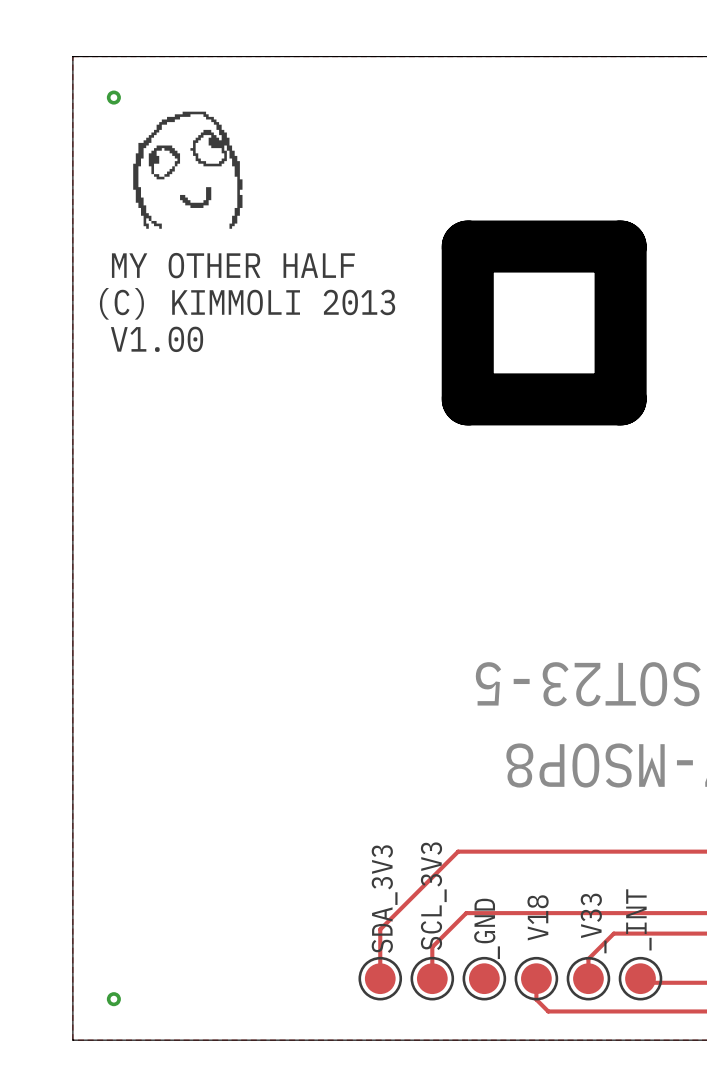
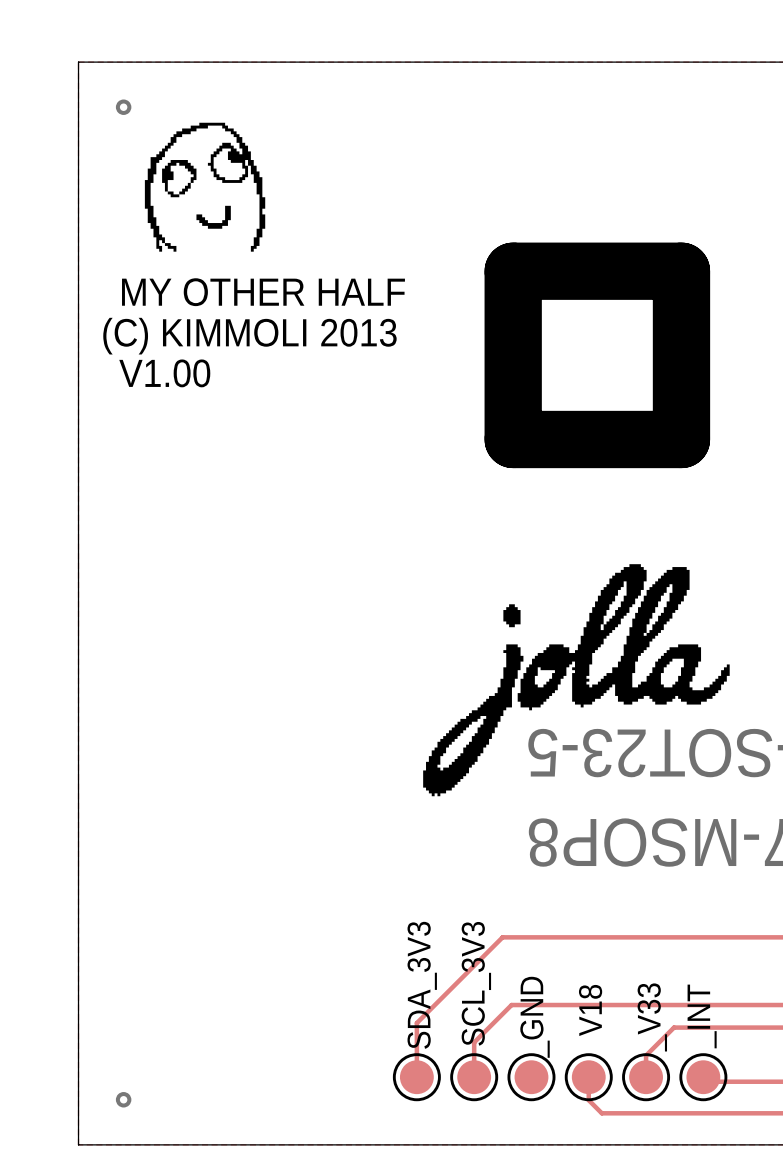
drawing: none -> [423, 564, 730, 797]

